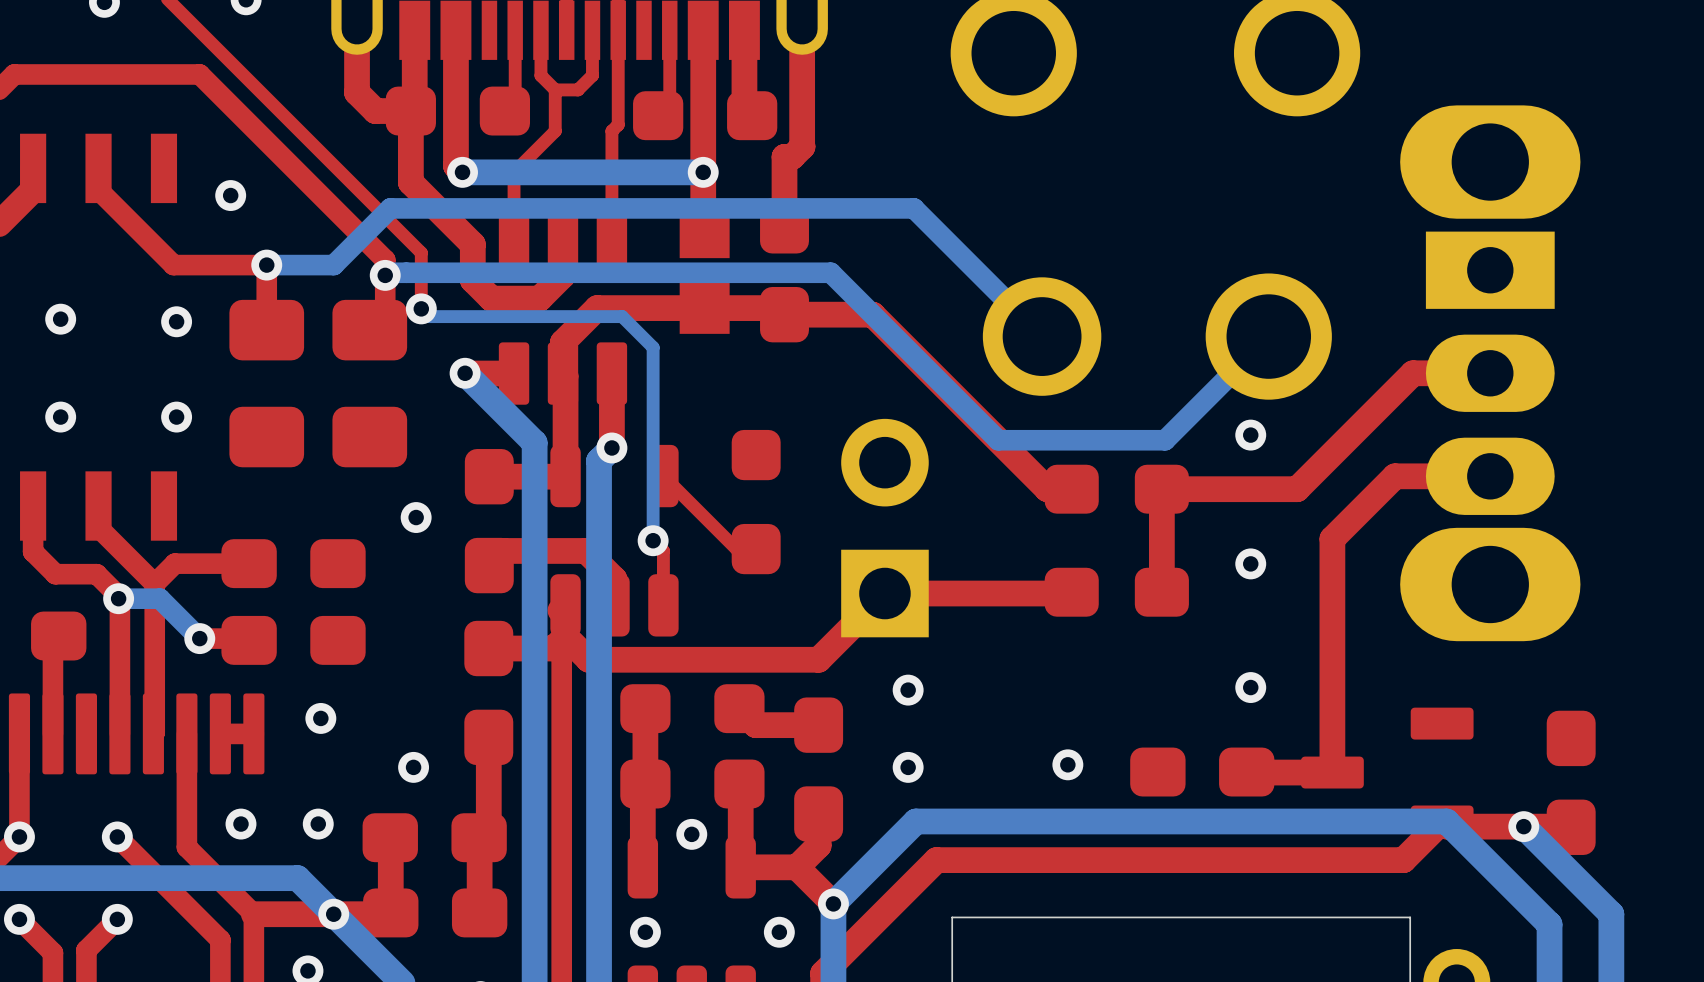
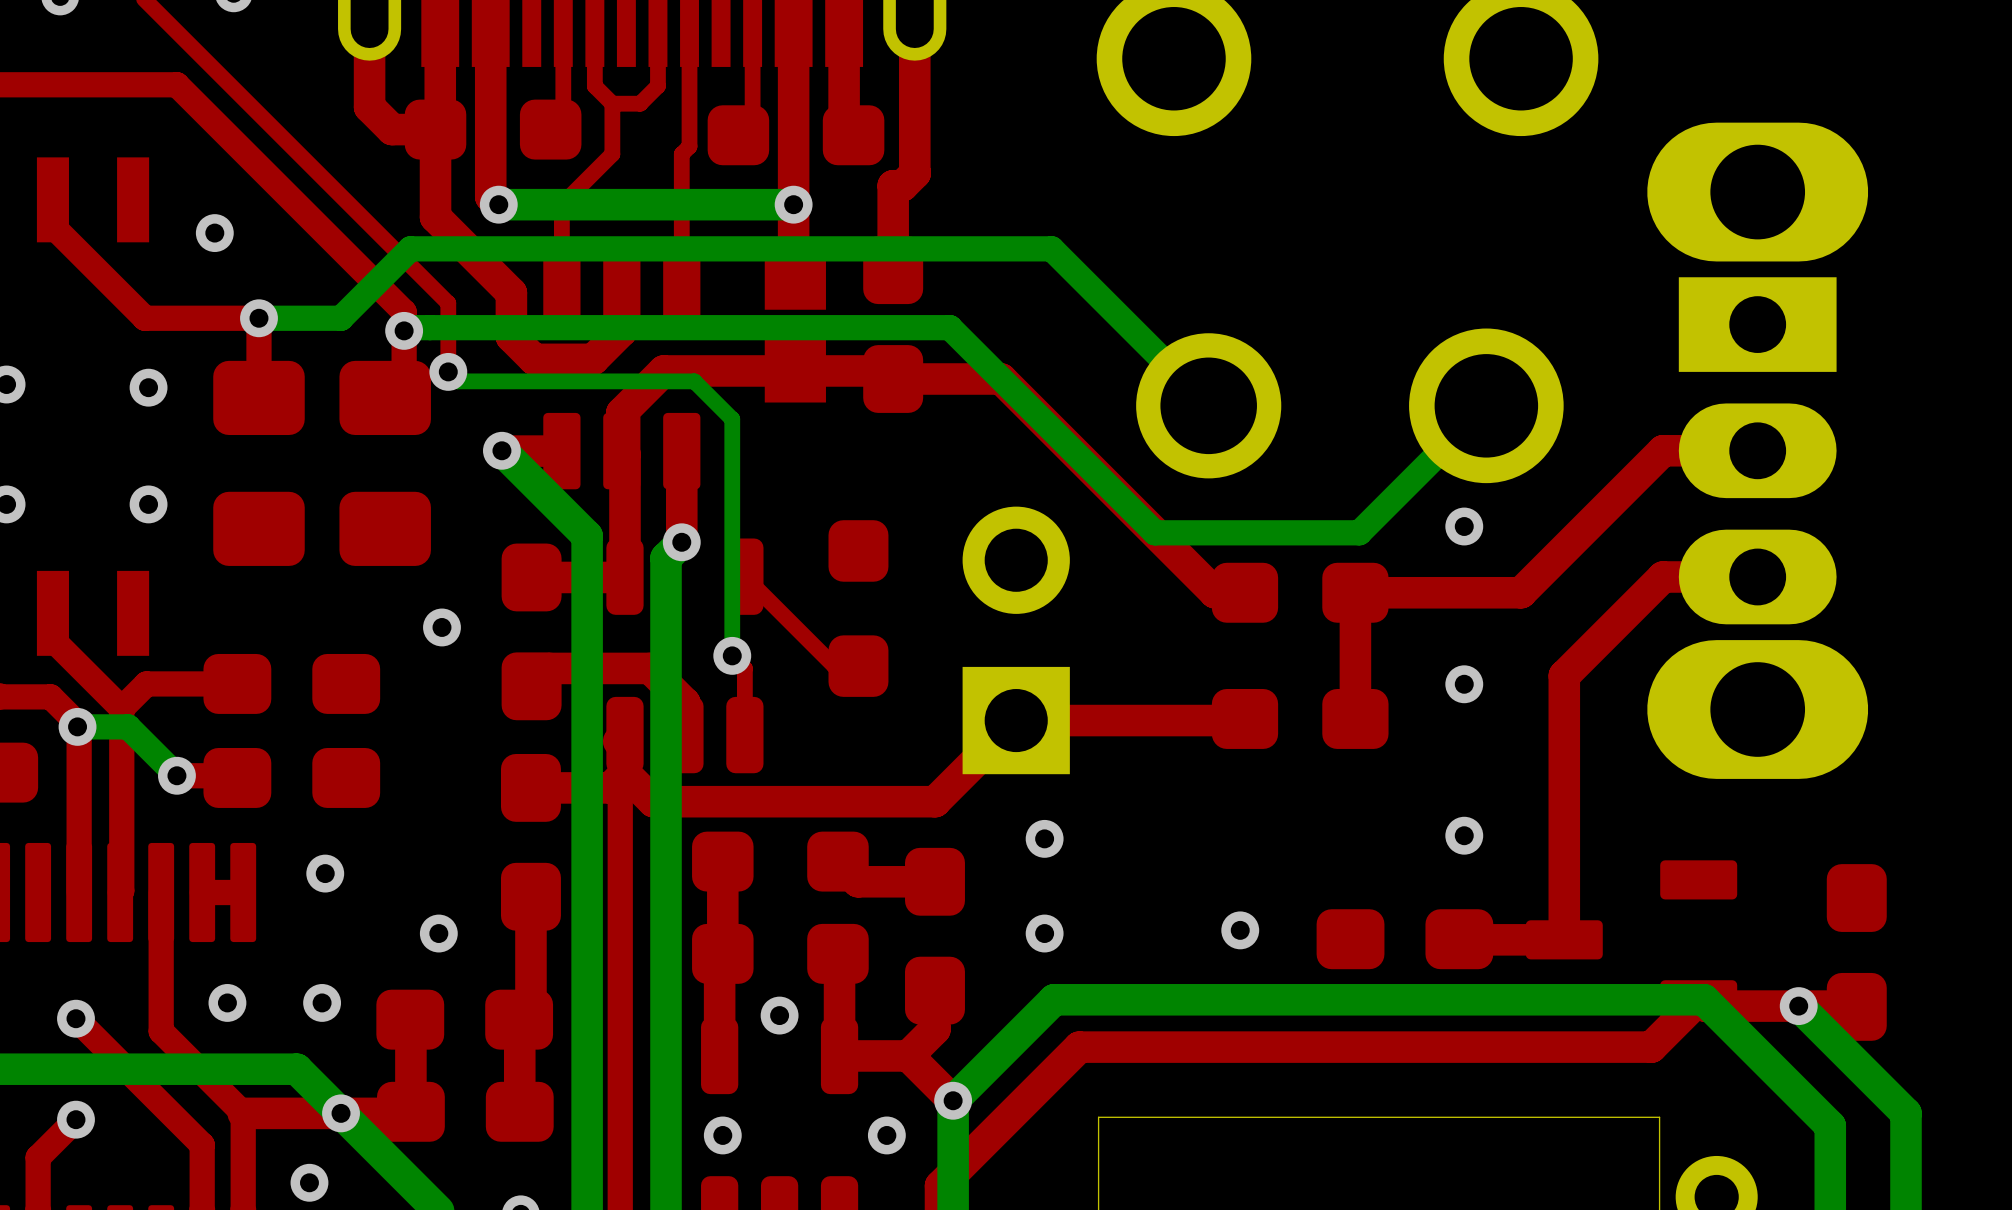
top track: (1413, 476) (1394, 476) (1332, 538) (1332, 556) -> (1663, 576) (1564, 675)

